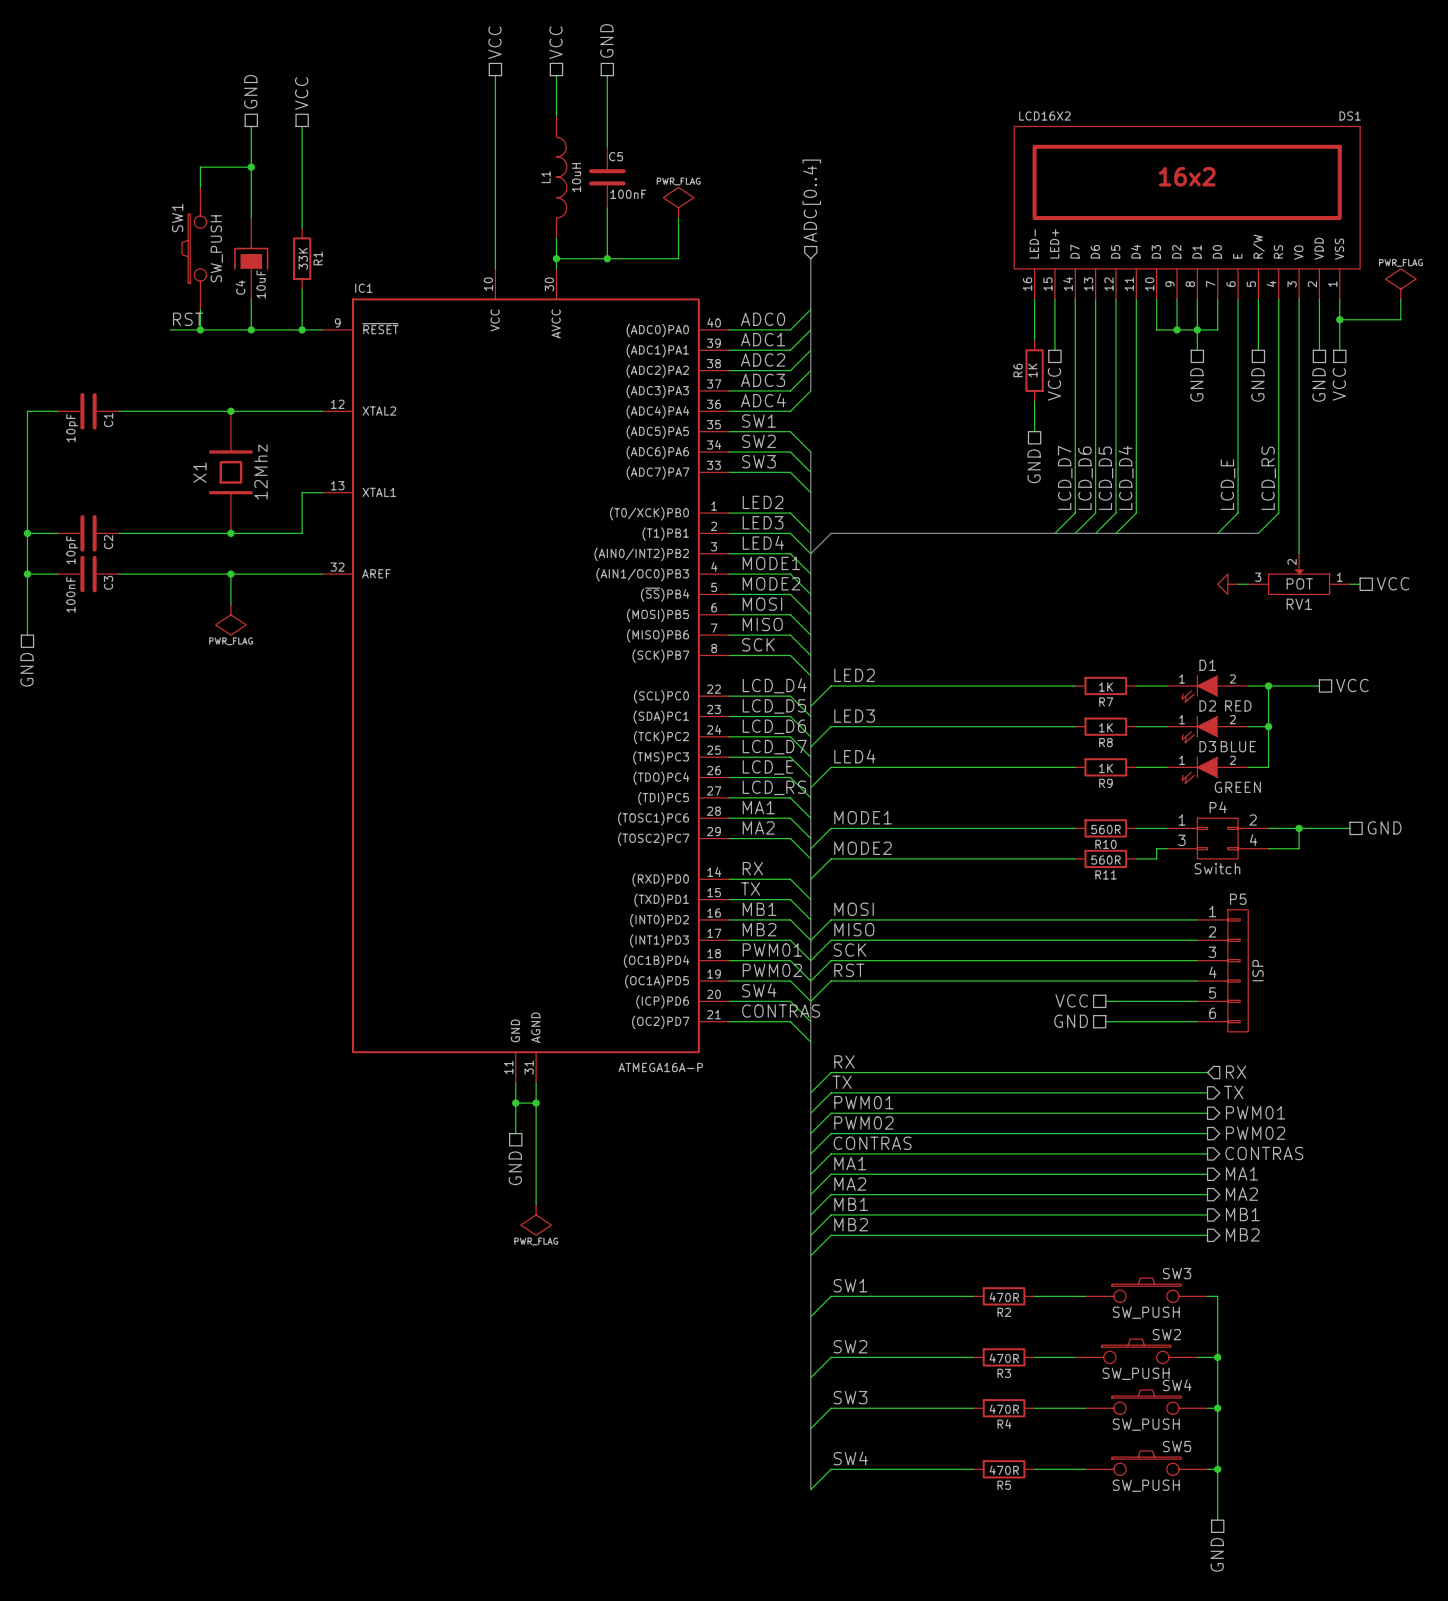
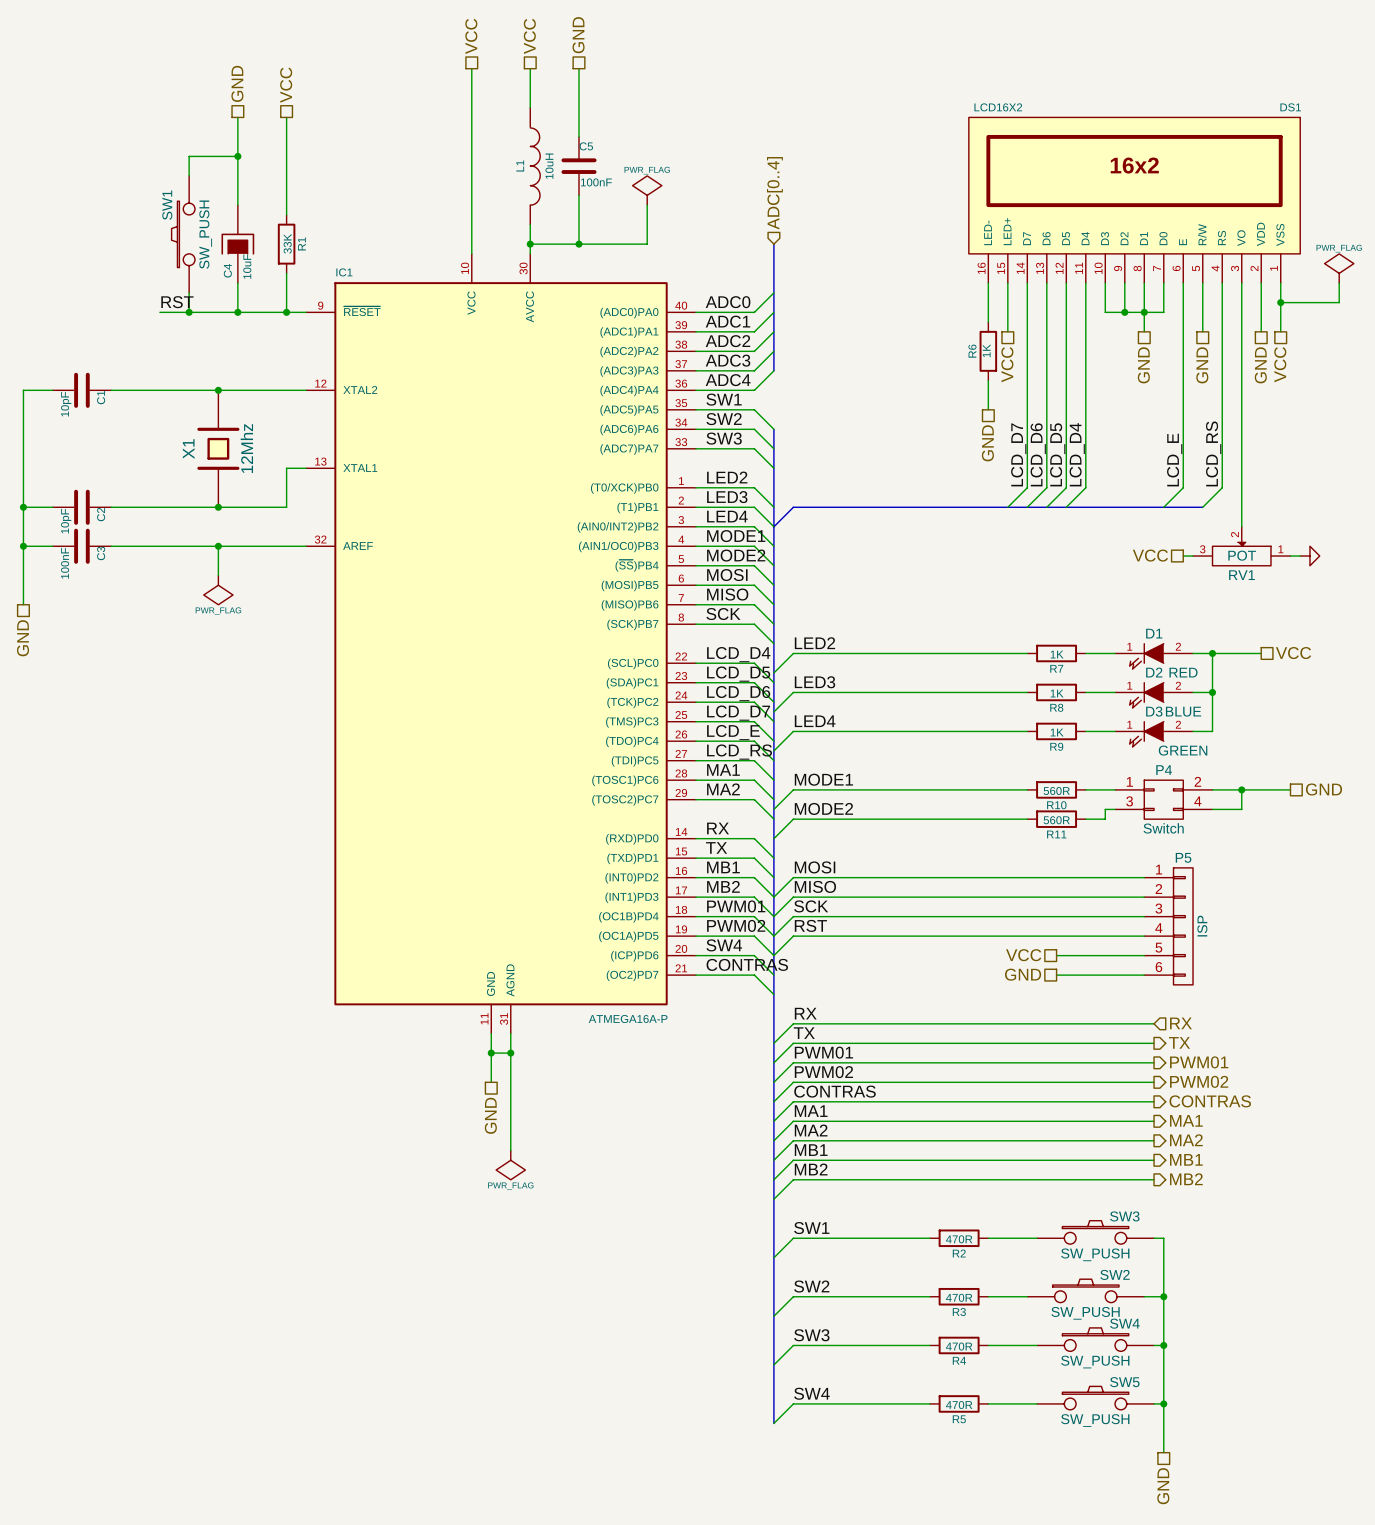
hierarchical label rotation: 0° (1393, 583) -> 180° (1150, 555)
hierarchical label position: VCC (1393, 583) -> VCC (1150, 555)
power symbol rotation: 0° (1227, 584) -> 180° (1309, 556)
power symbol position: (1227, 584) -> (1309, 556)

